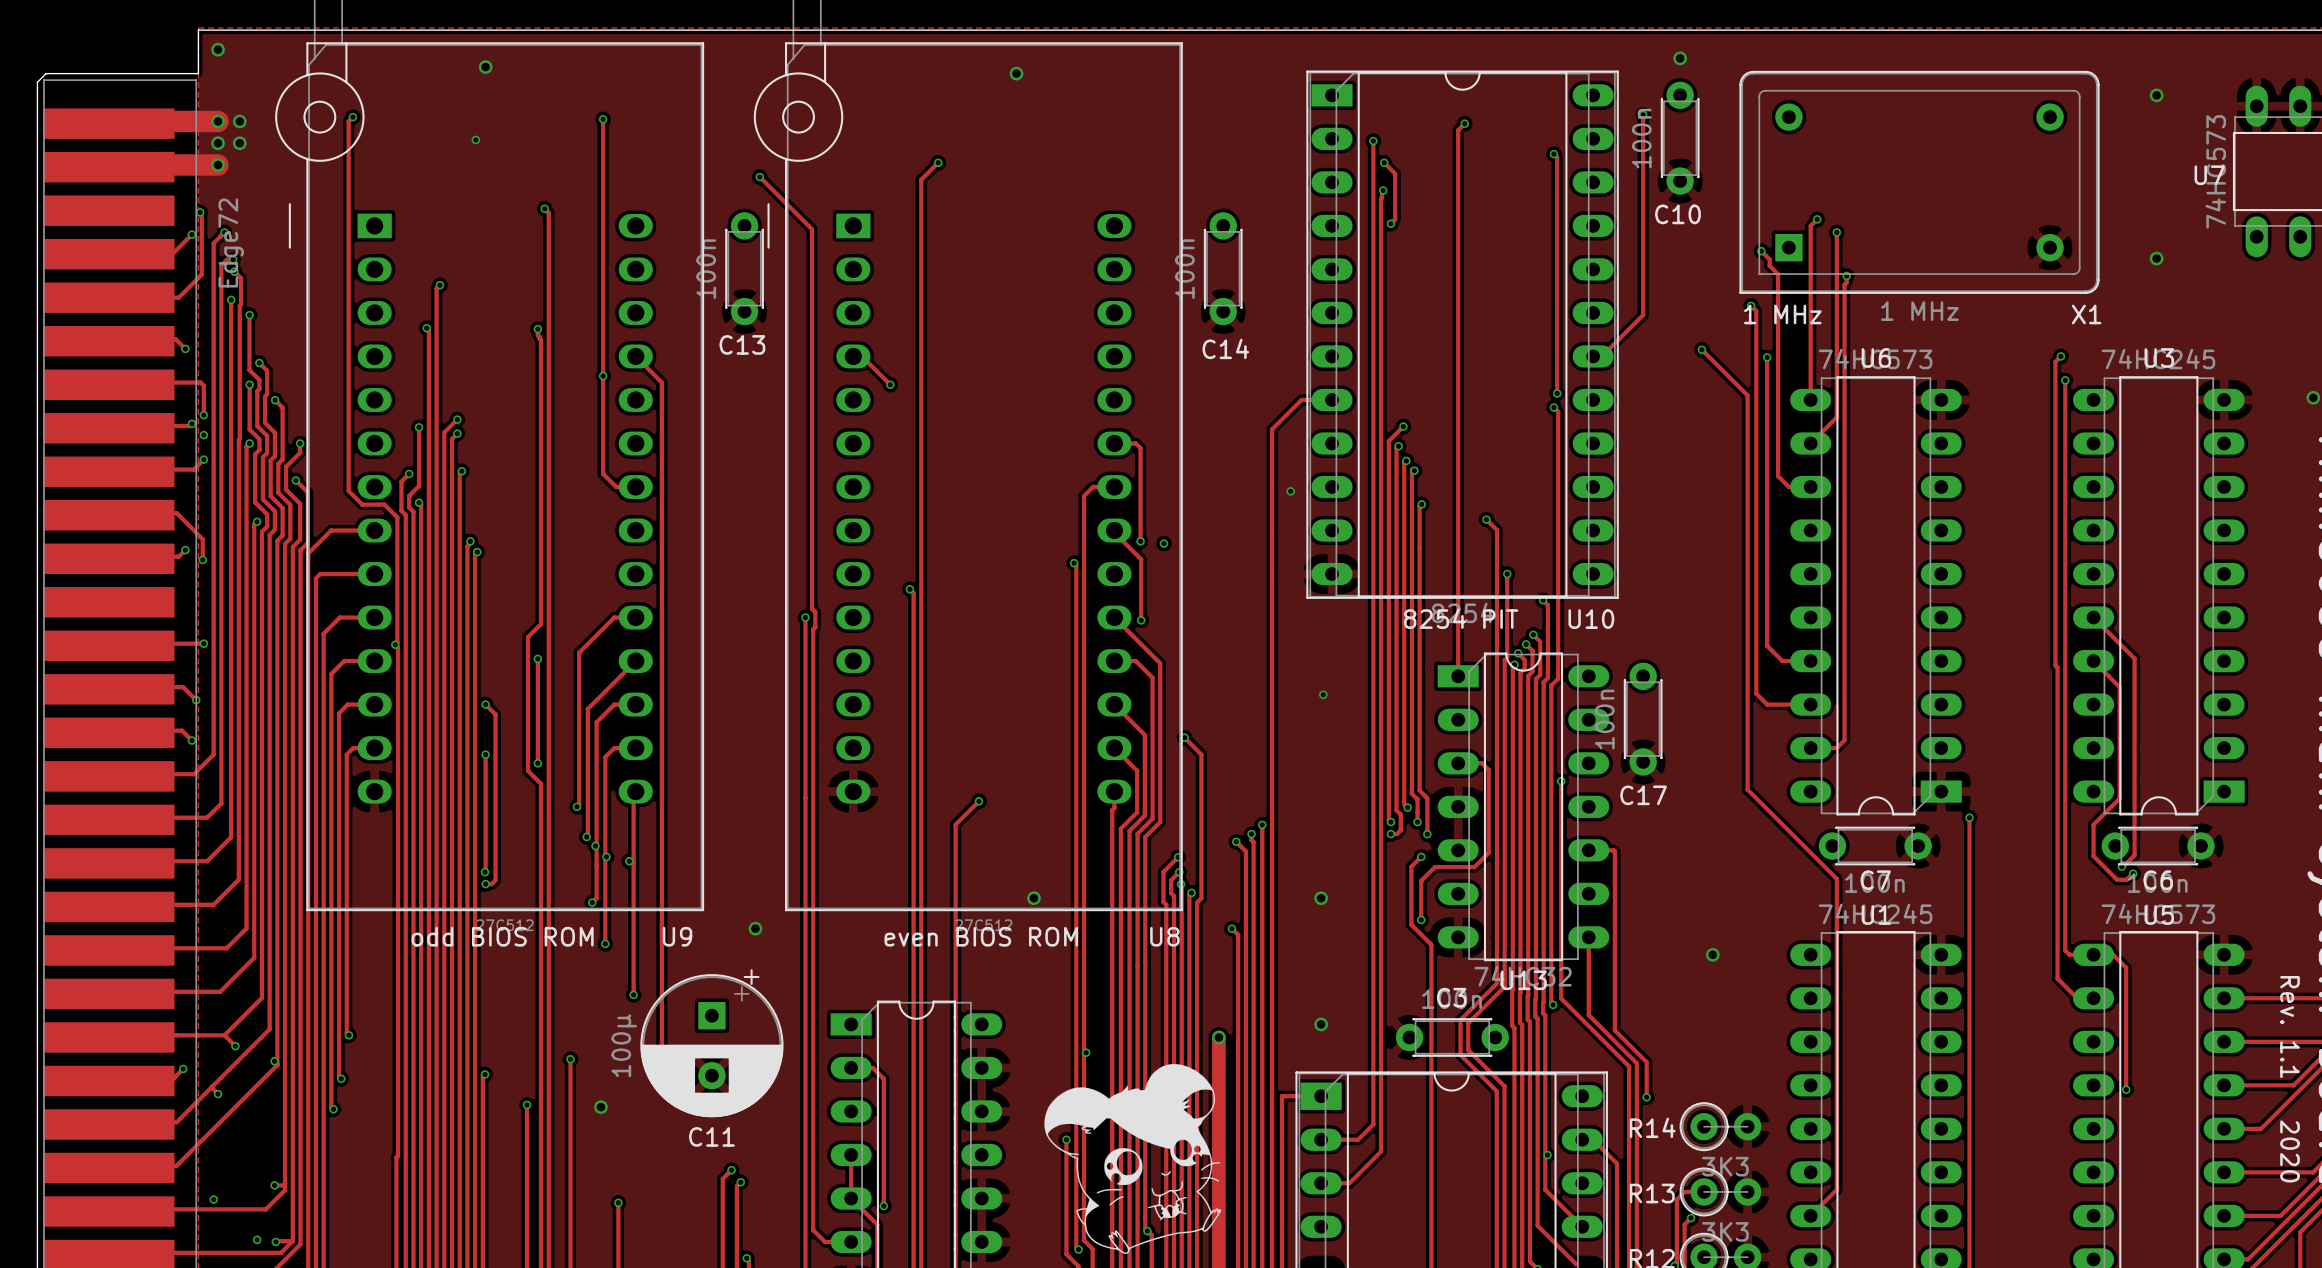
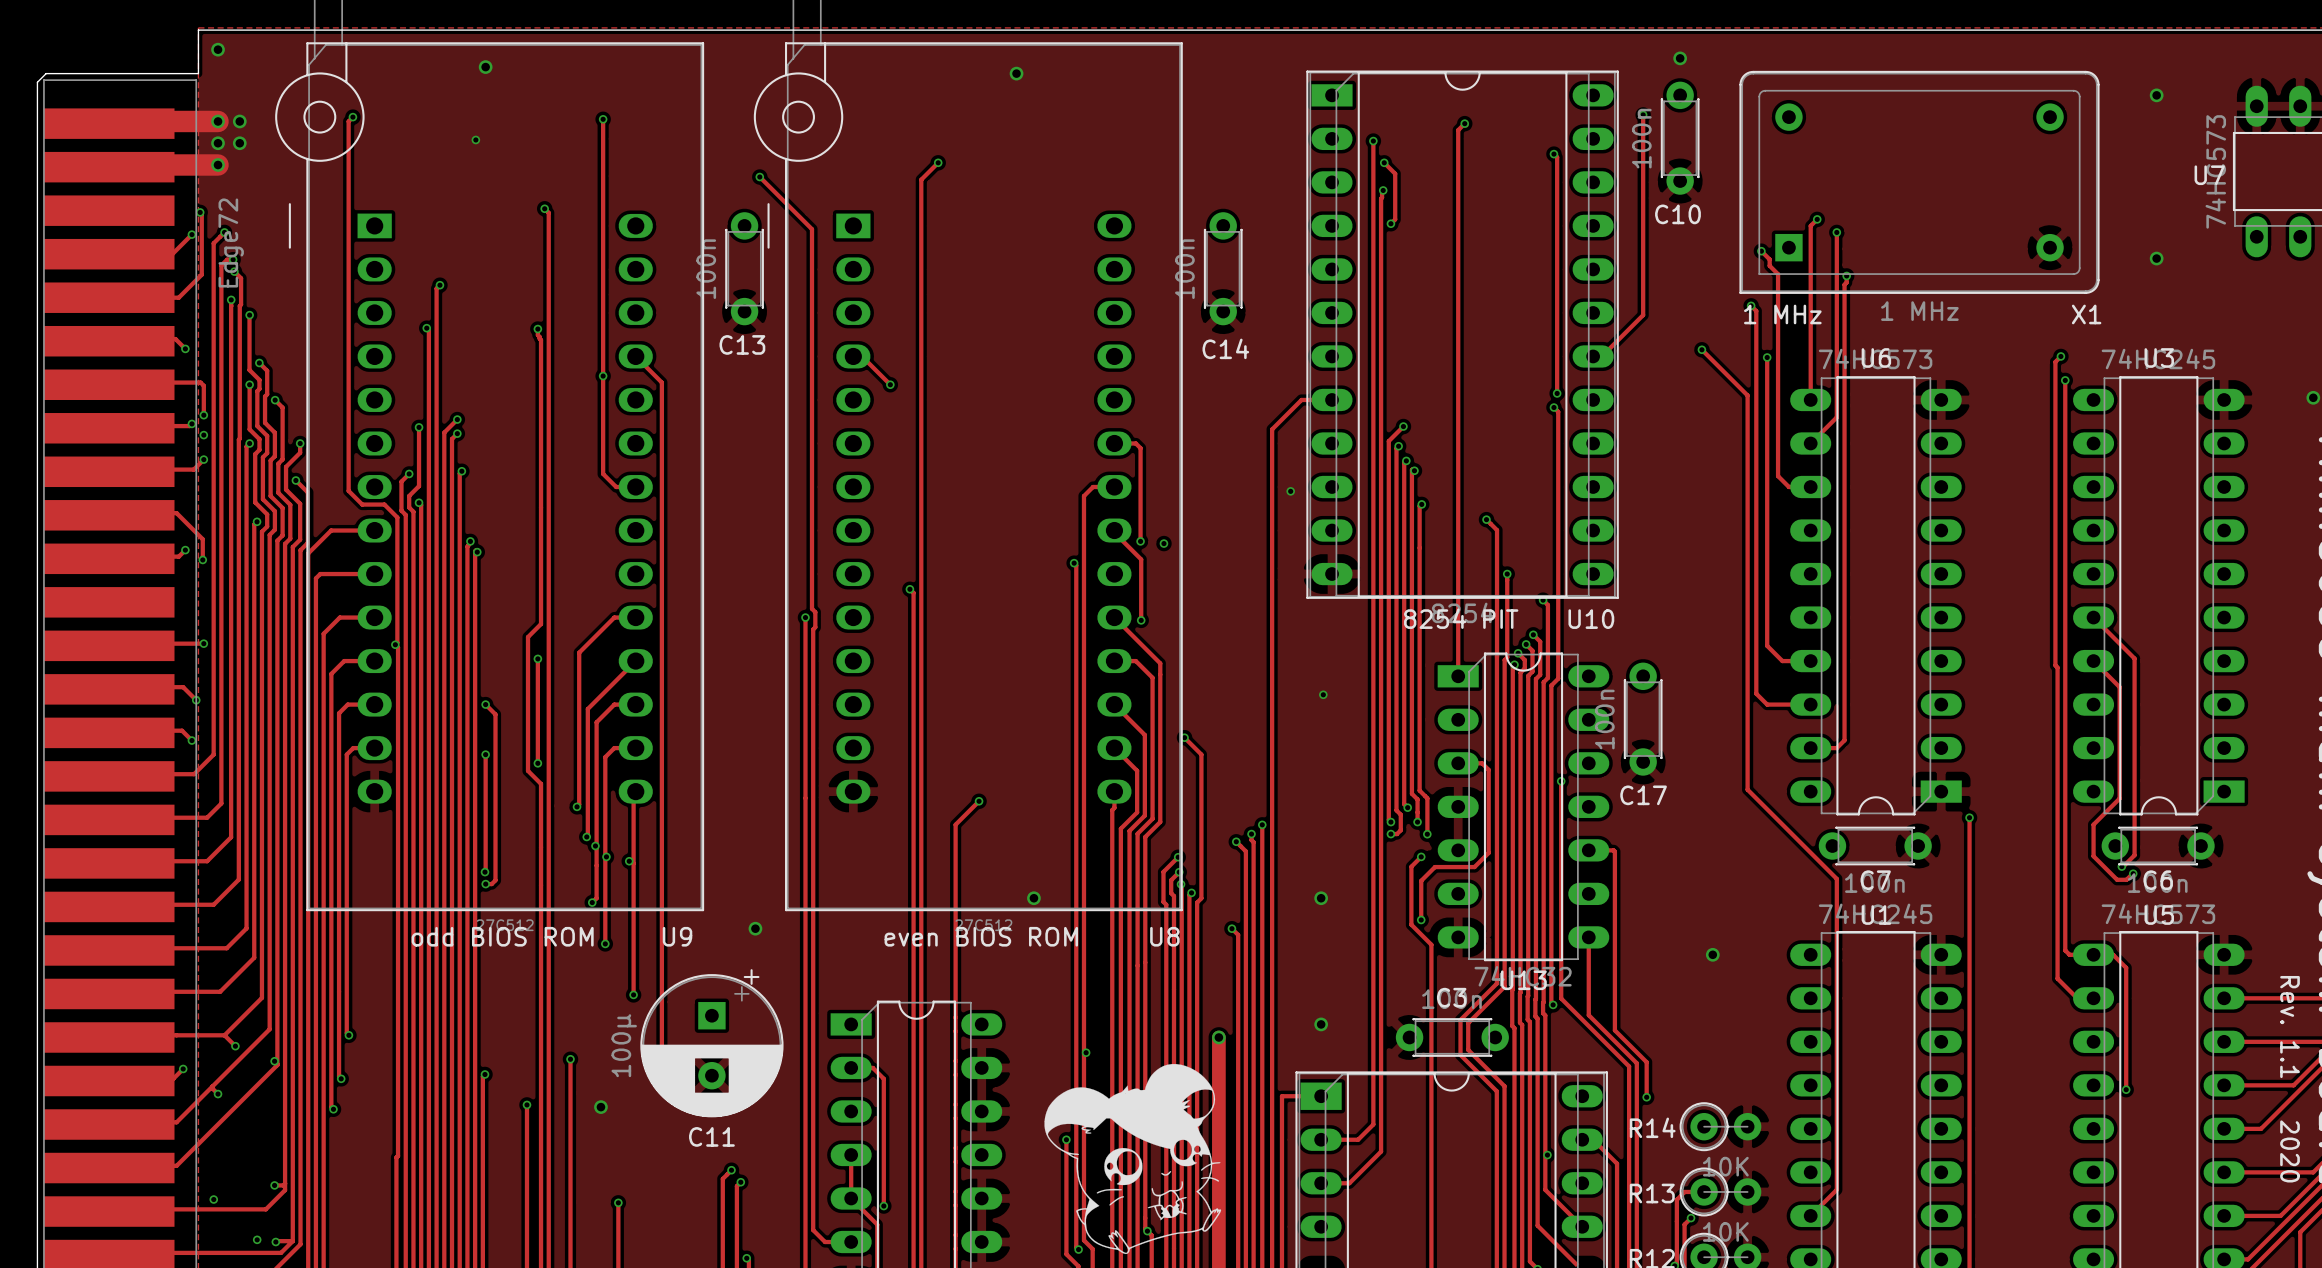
R14 value: 3K3 (1725, 1166) -> 10K (1725, 1166)
R13 value: 3K3 (1725, 1231) -> 10K (1725, 1231)

